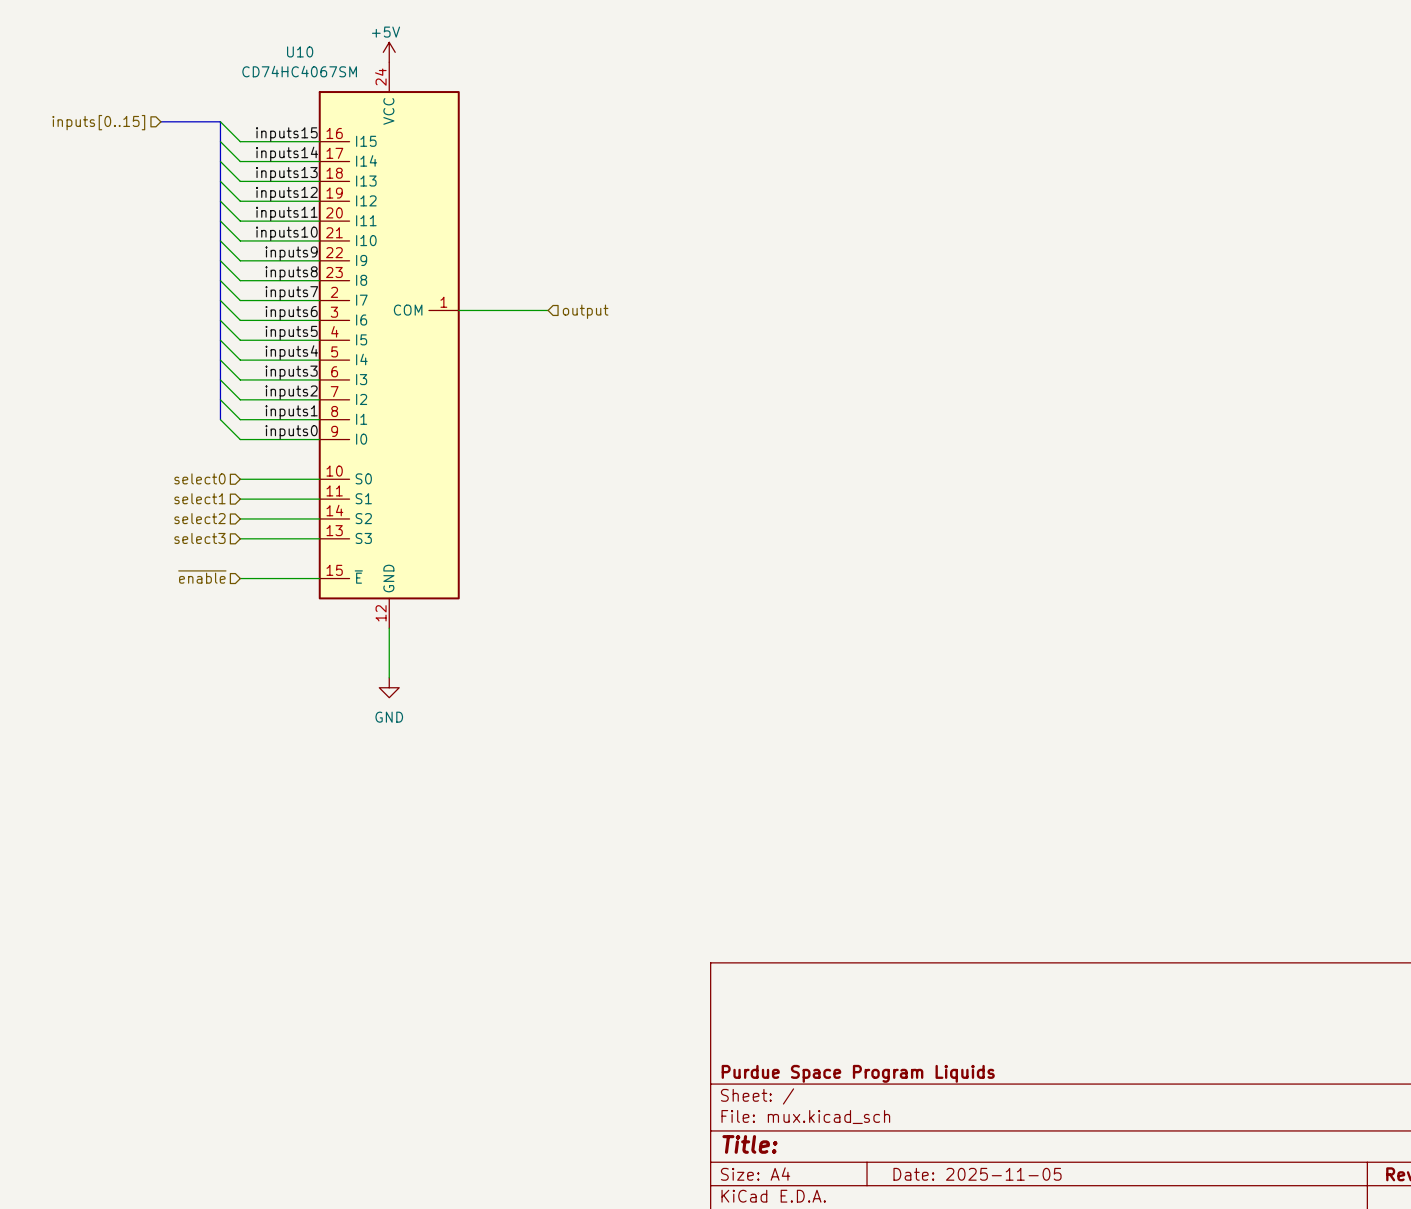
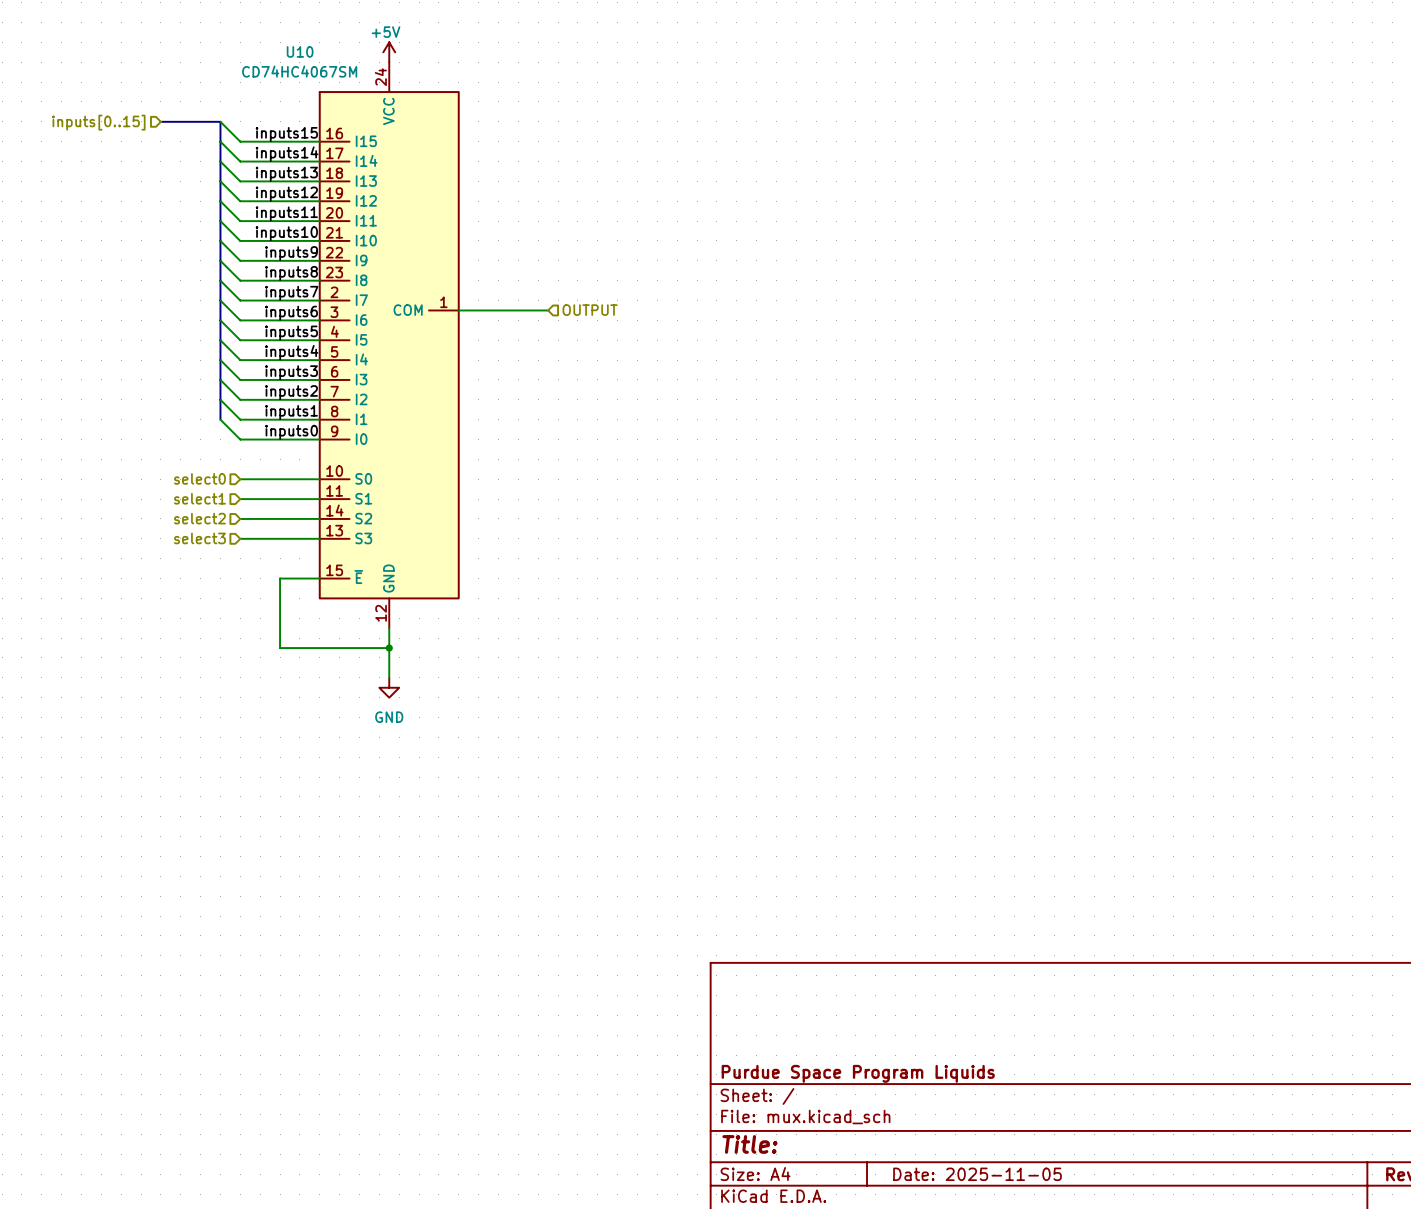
hierarchical label: output (585, 311) -> OUTPUT (590, 310)
hierarchical label: ~{enable} (202, 577) -> none
wire: (240, 578) (280, 578) -> (389, 648) (280, 648) (280, 578)
junction: none -> (389, 648)

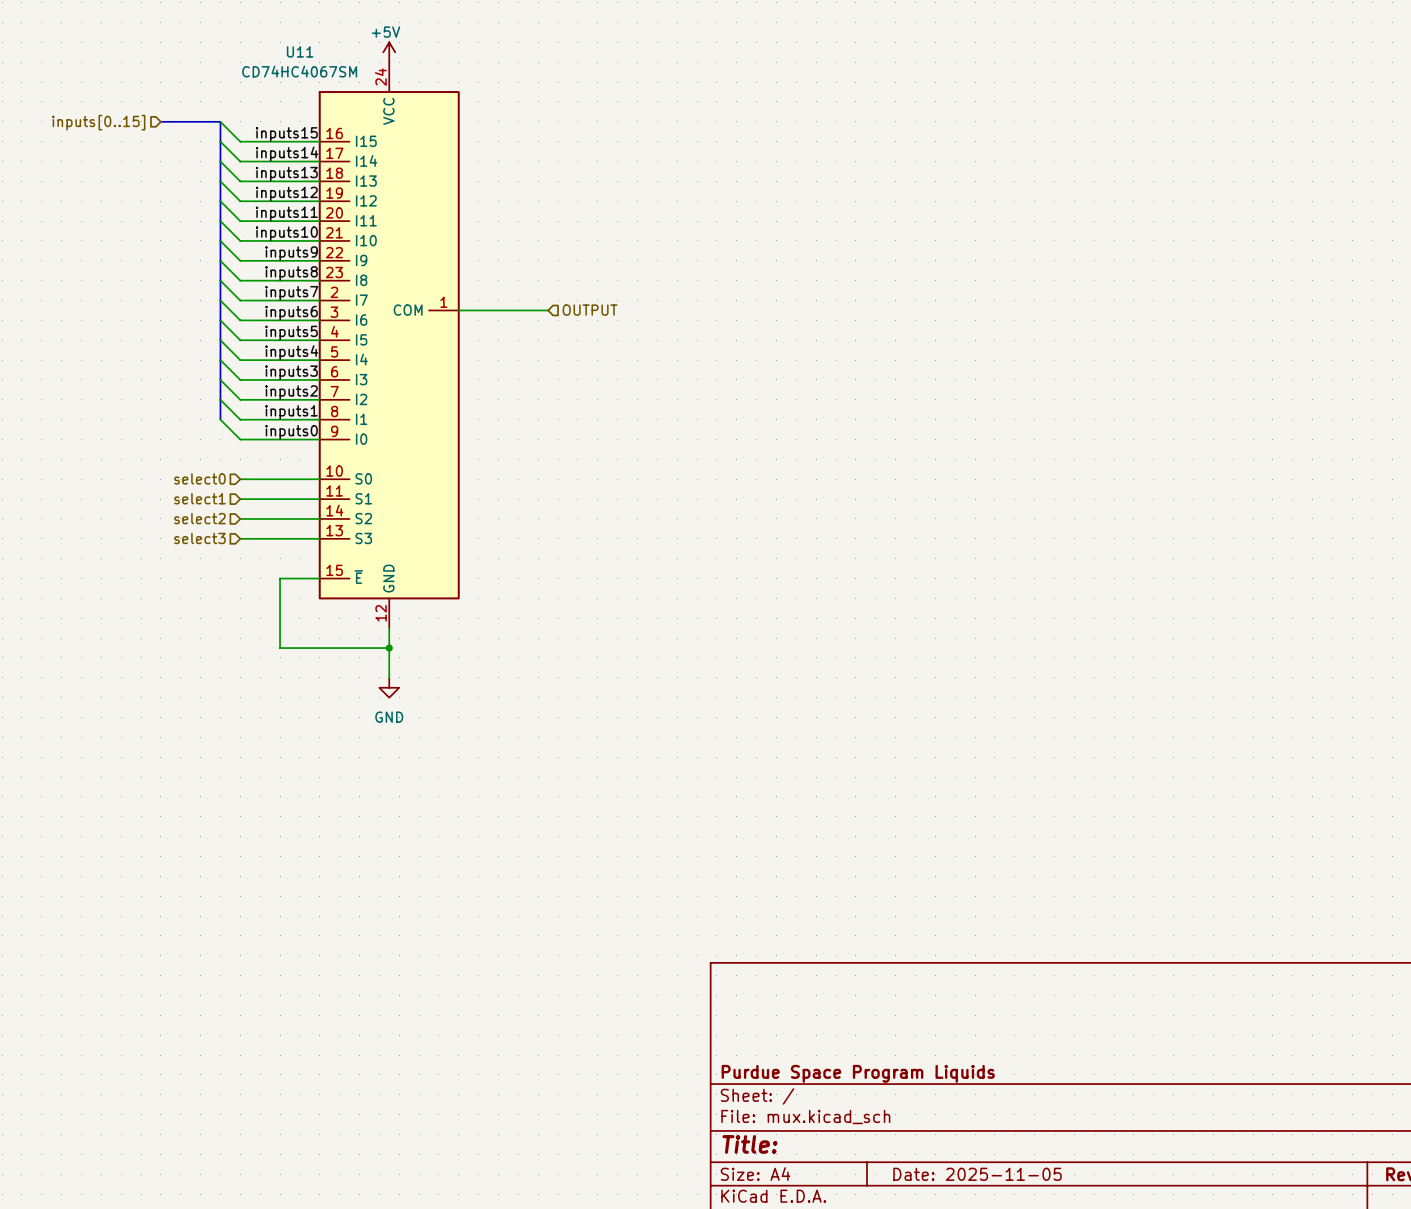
U10 name: U10 (300, 51) -> U11 (300, 51)

